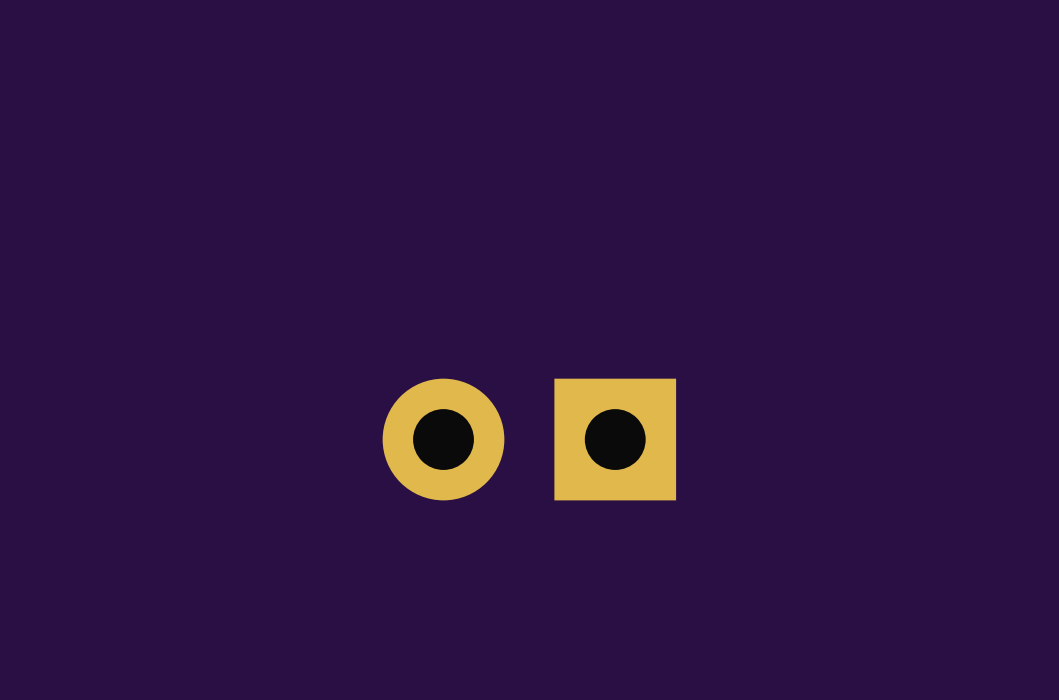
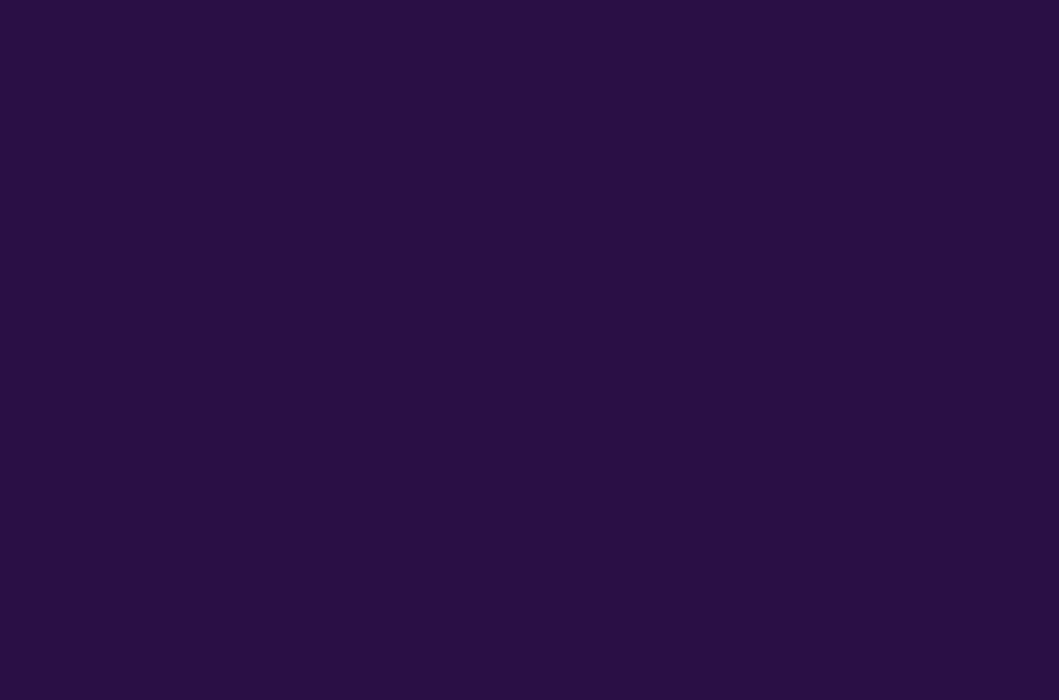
part: (529, 439) -> none

